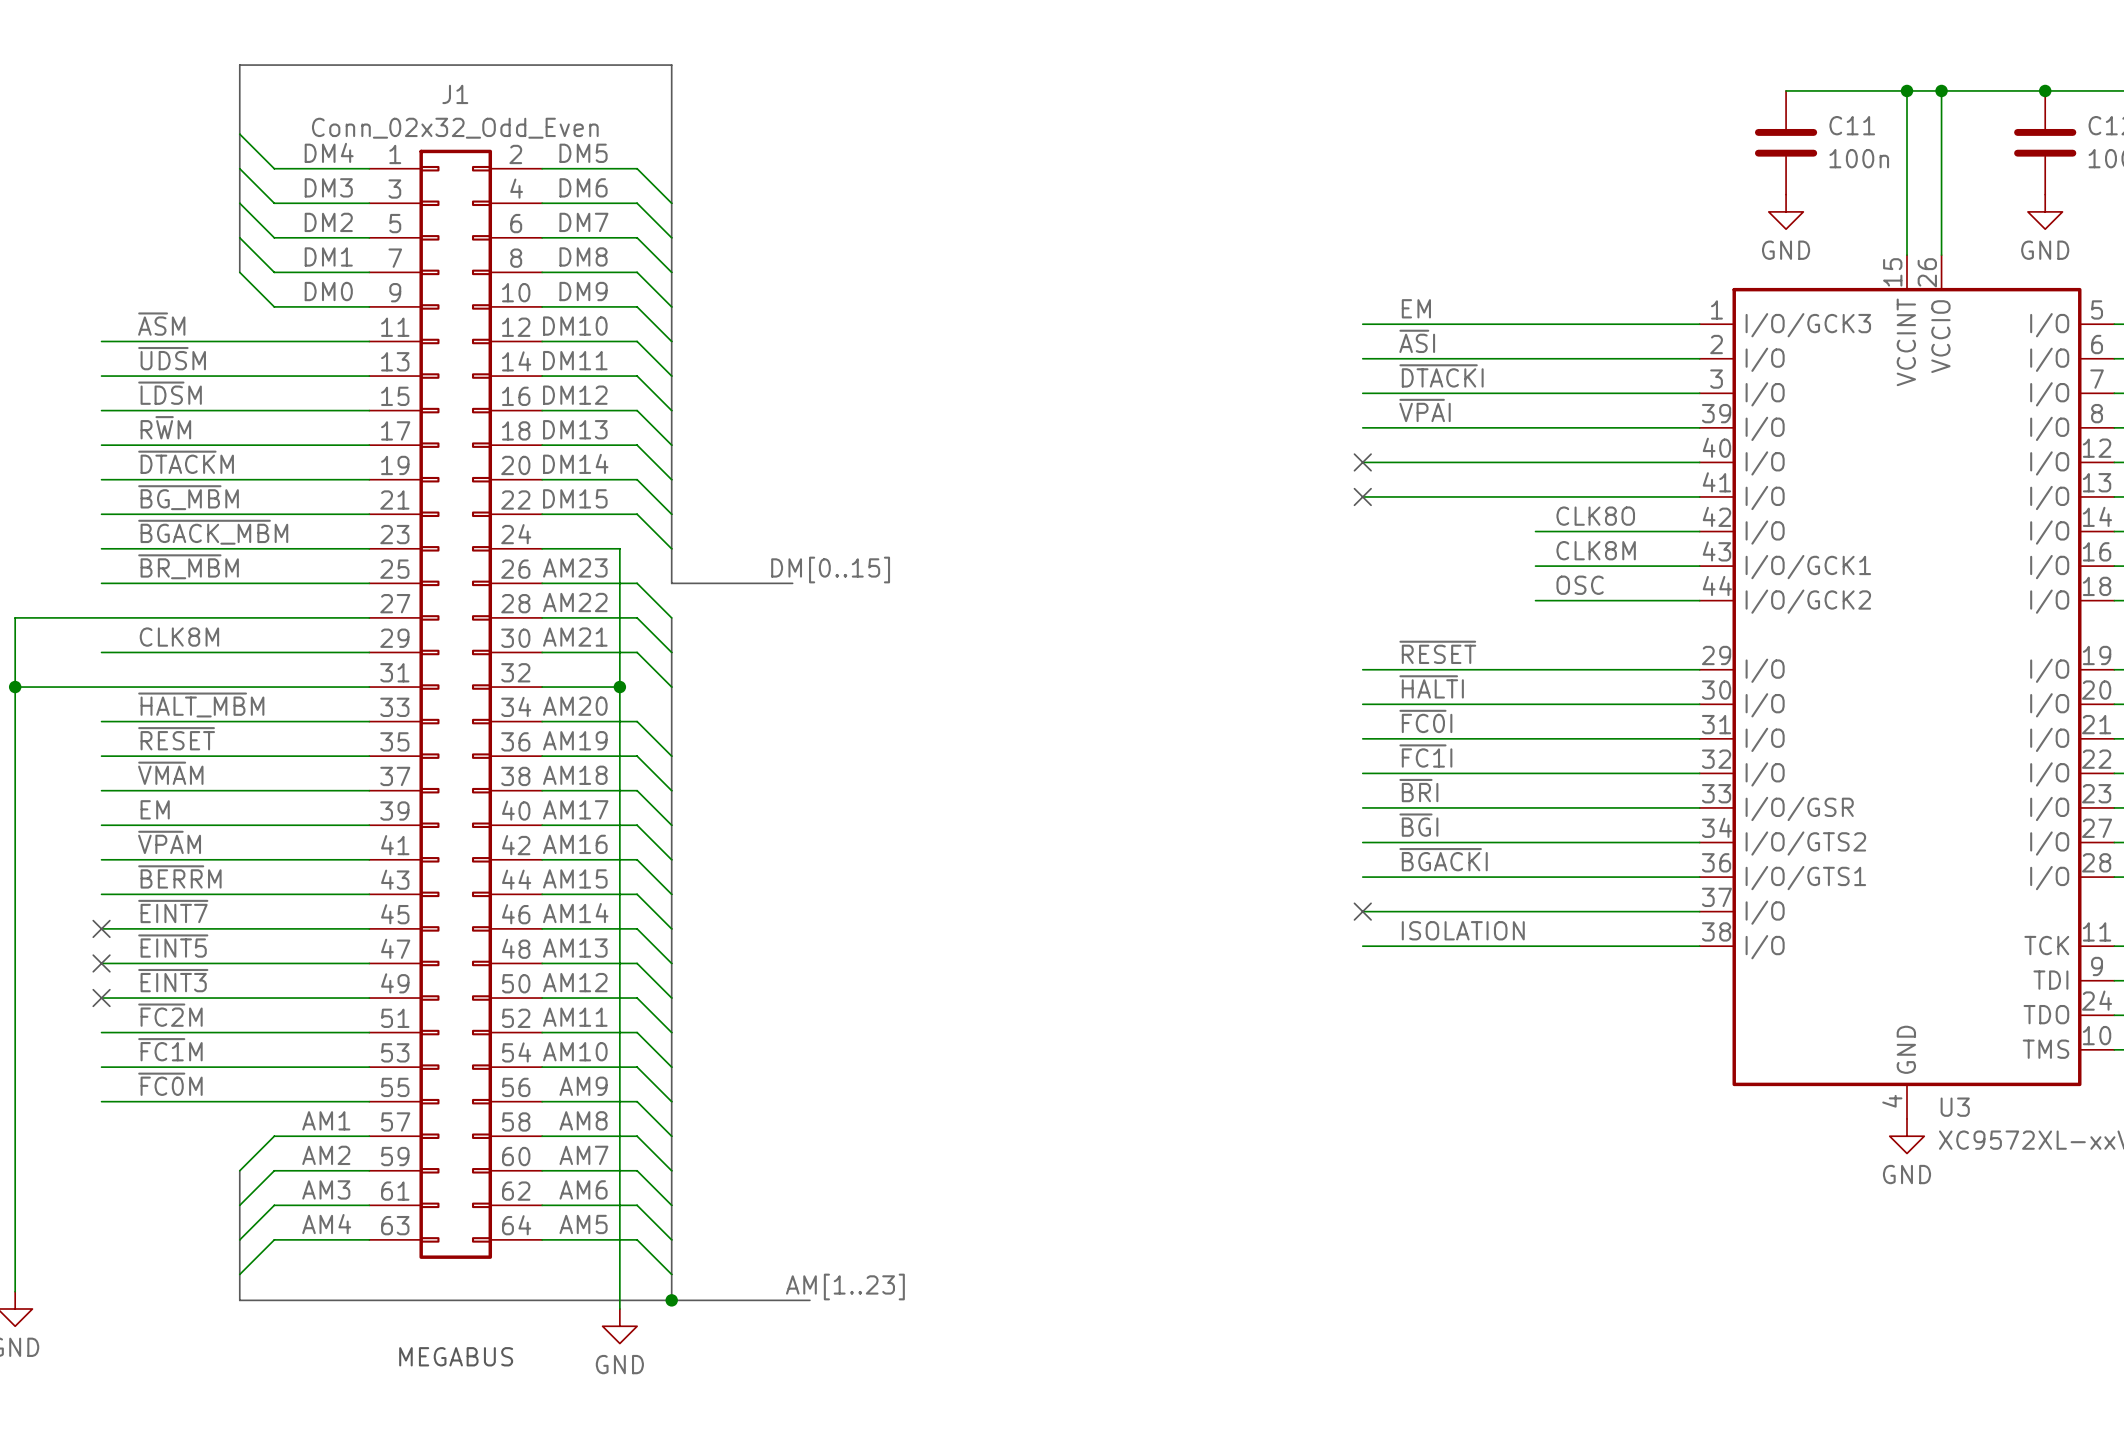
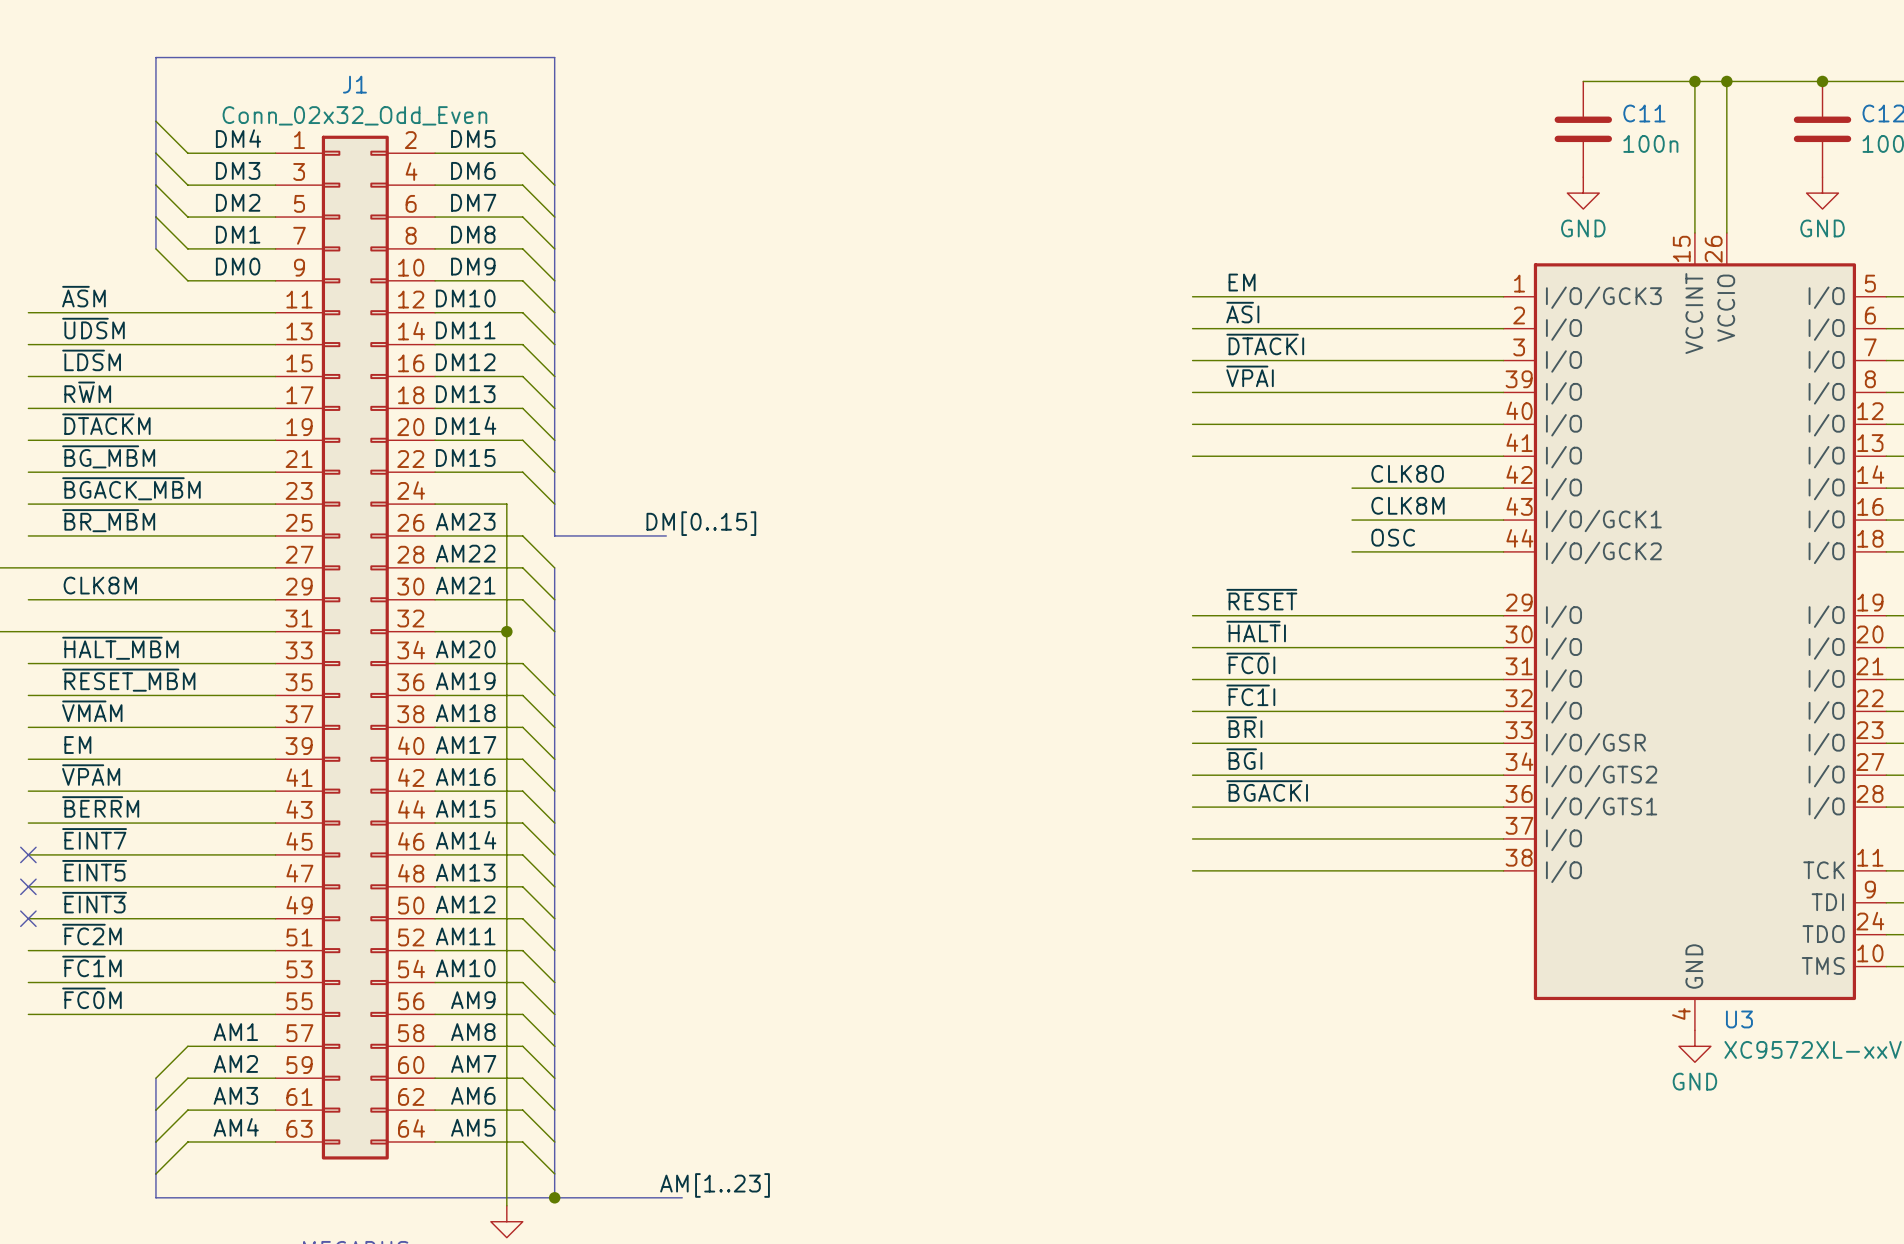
no-connect mark: (1362, 462) -> none
no-connect mark: (1362, 496) -> none
label: ~{RESET} (176, 738) -> ~{RESET_MB}M (128, 680)
no-connect mark: (1362, 911) -> none
label: ISOLATION (1463, 930) -> none

